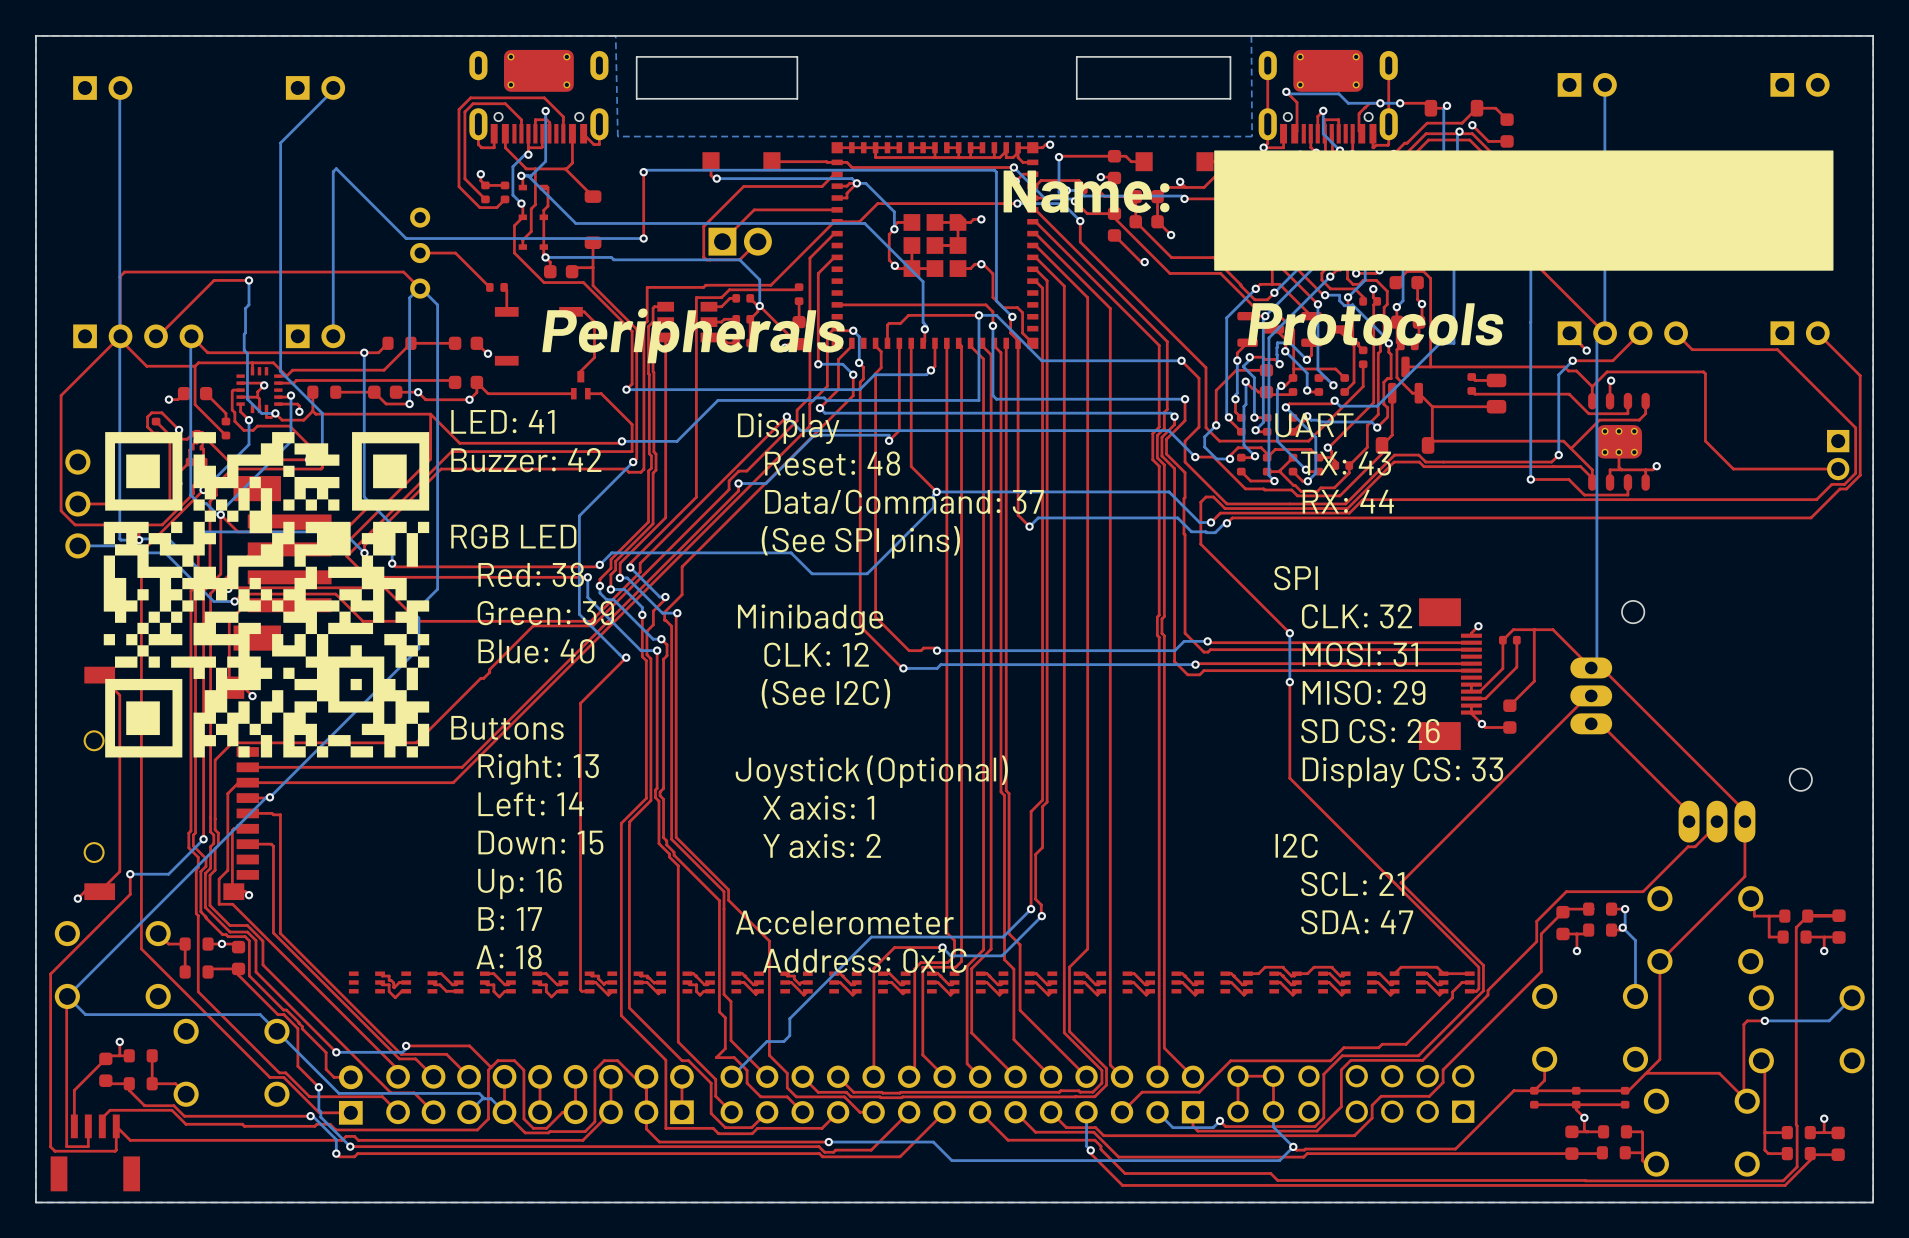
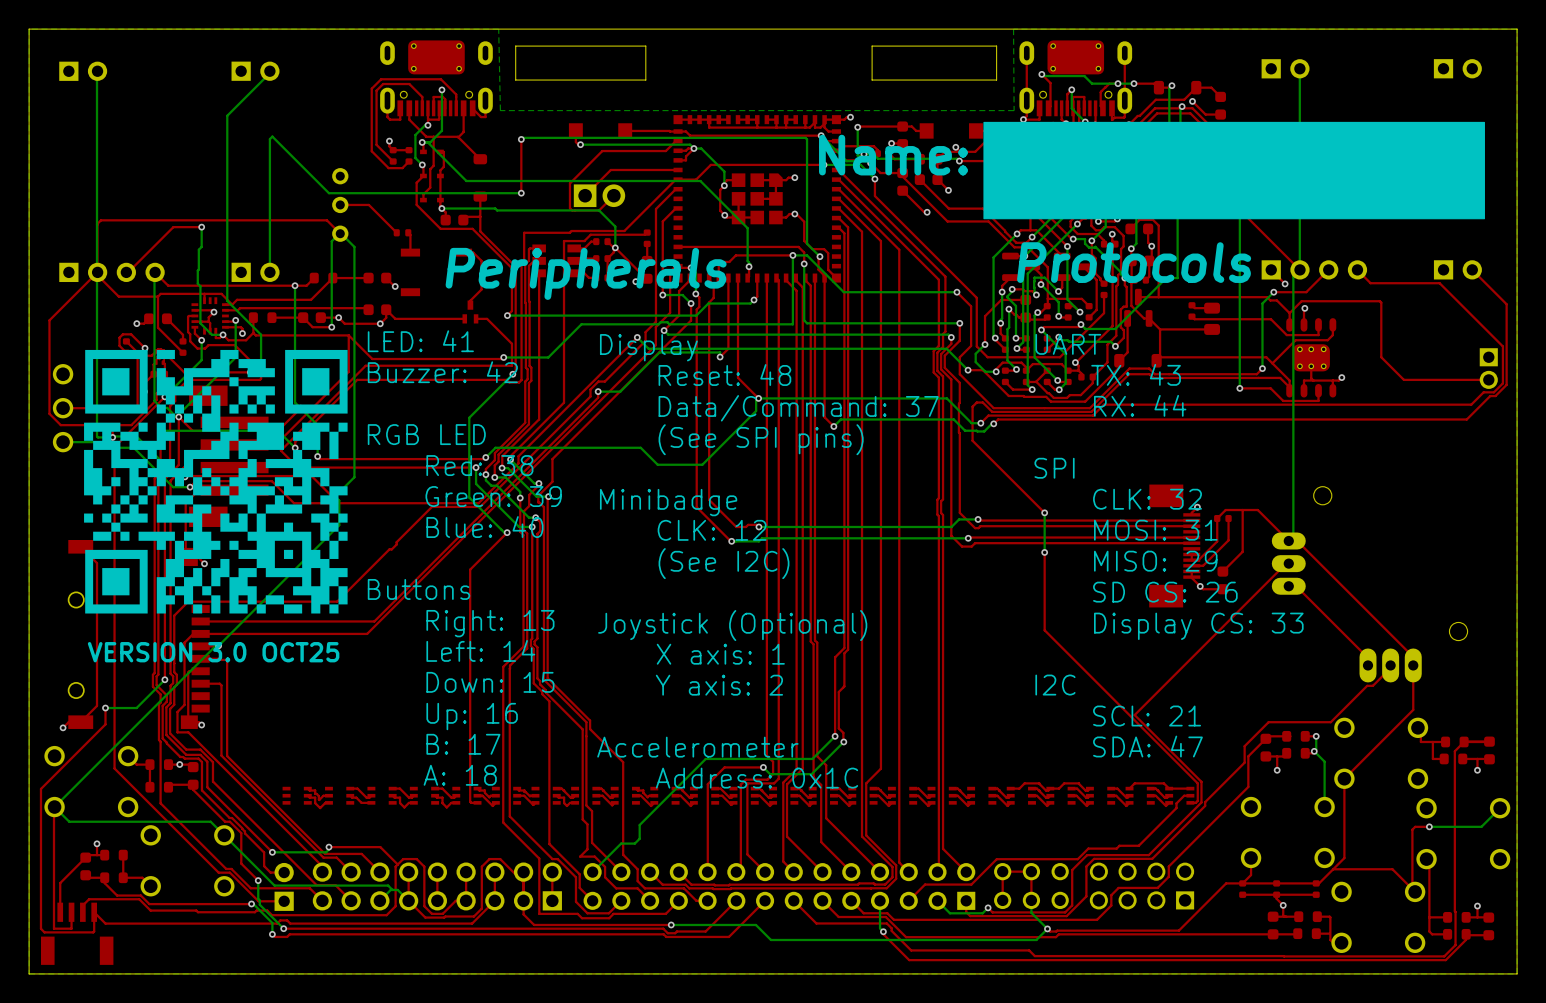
text: none -> VERSION 3.0 OCT25 (213, 652)

